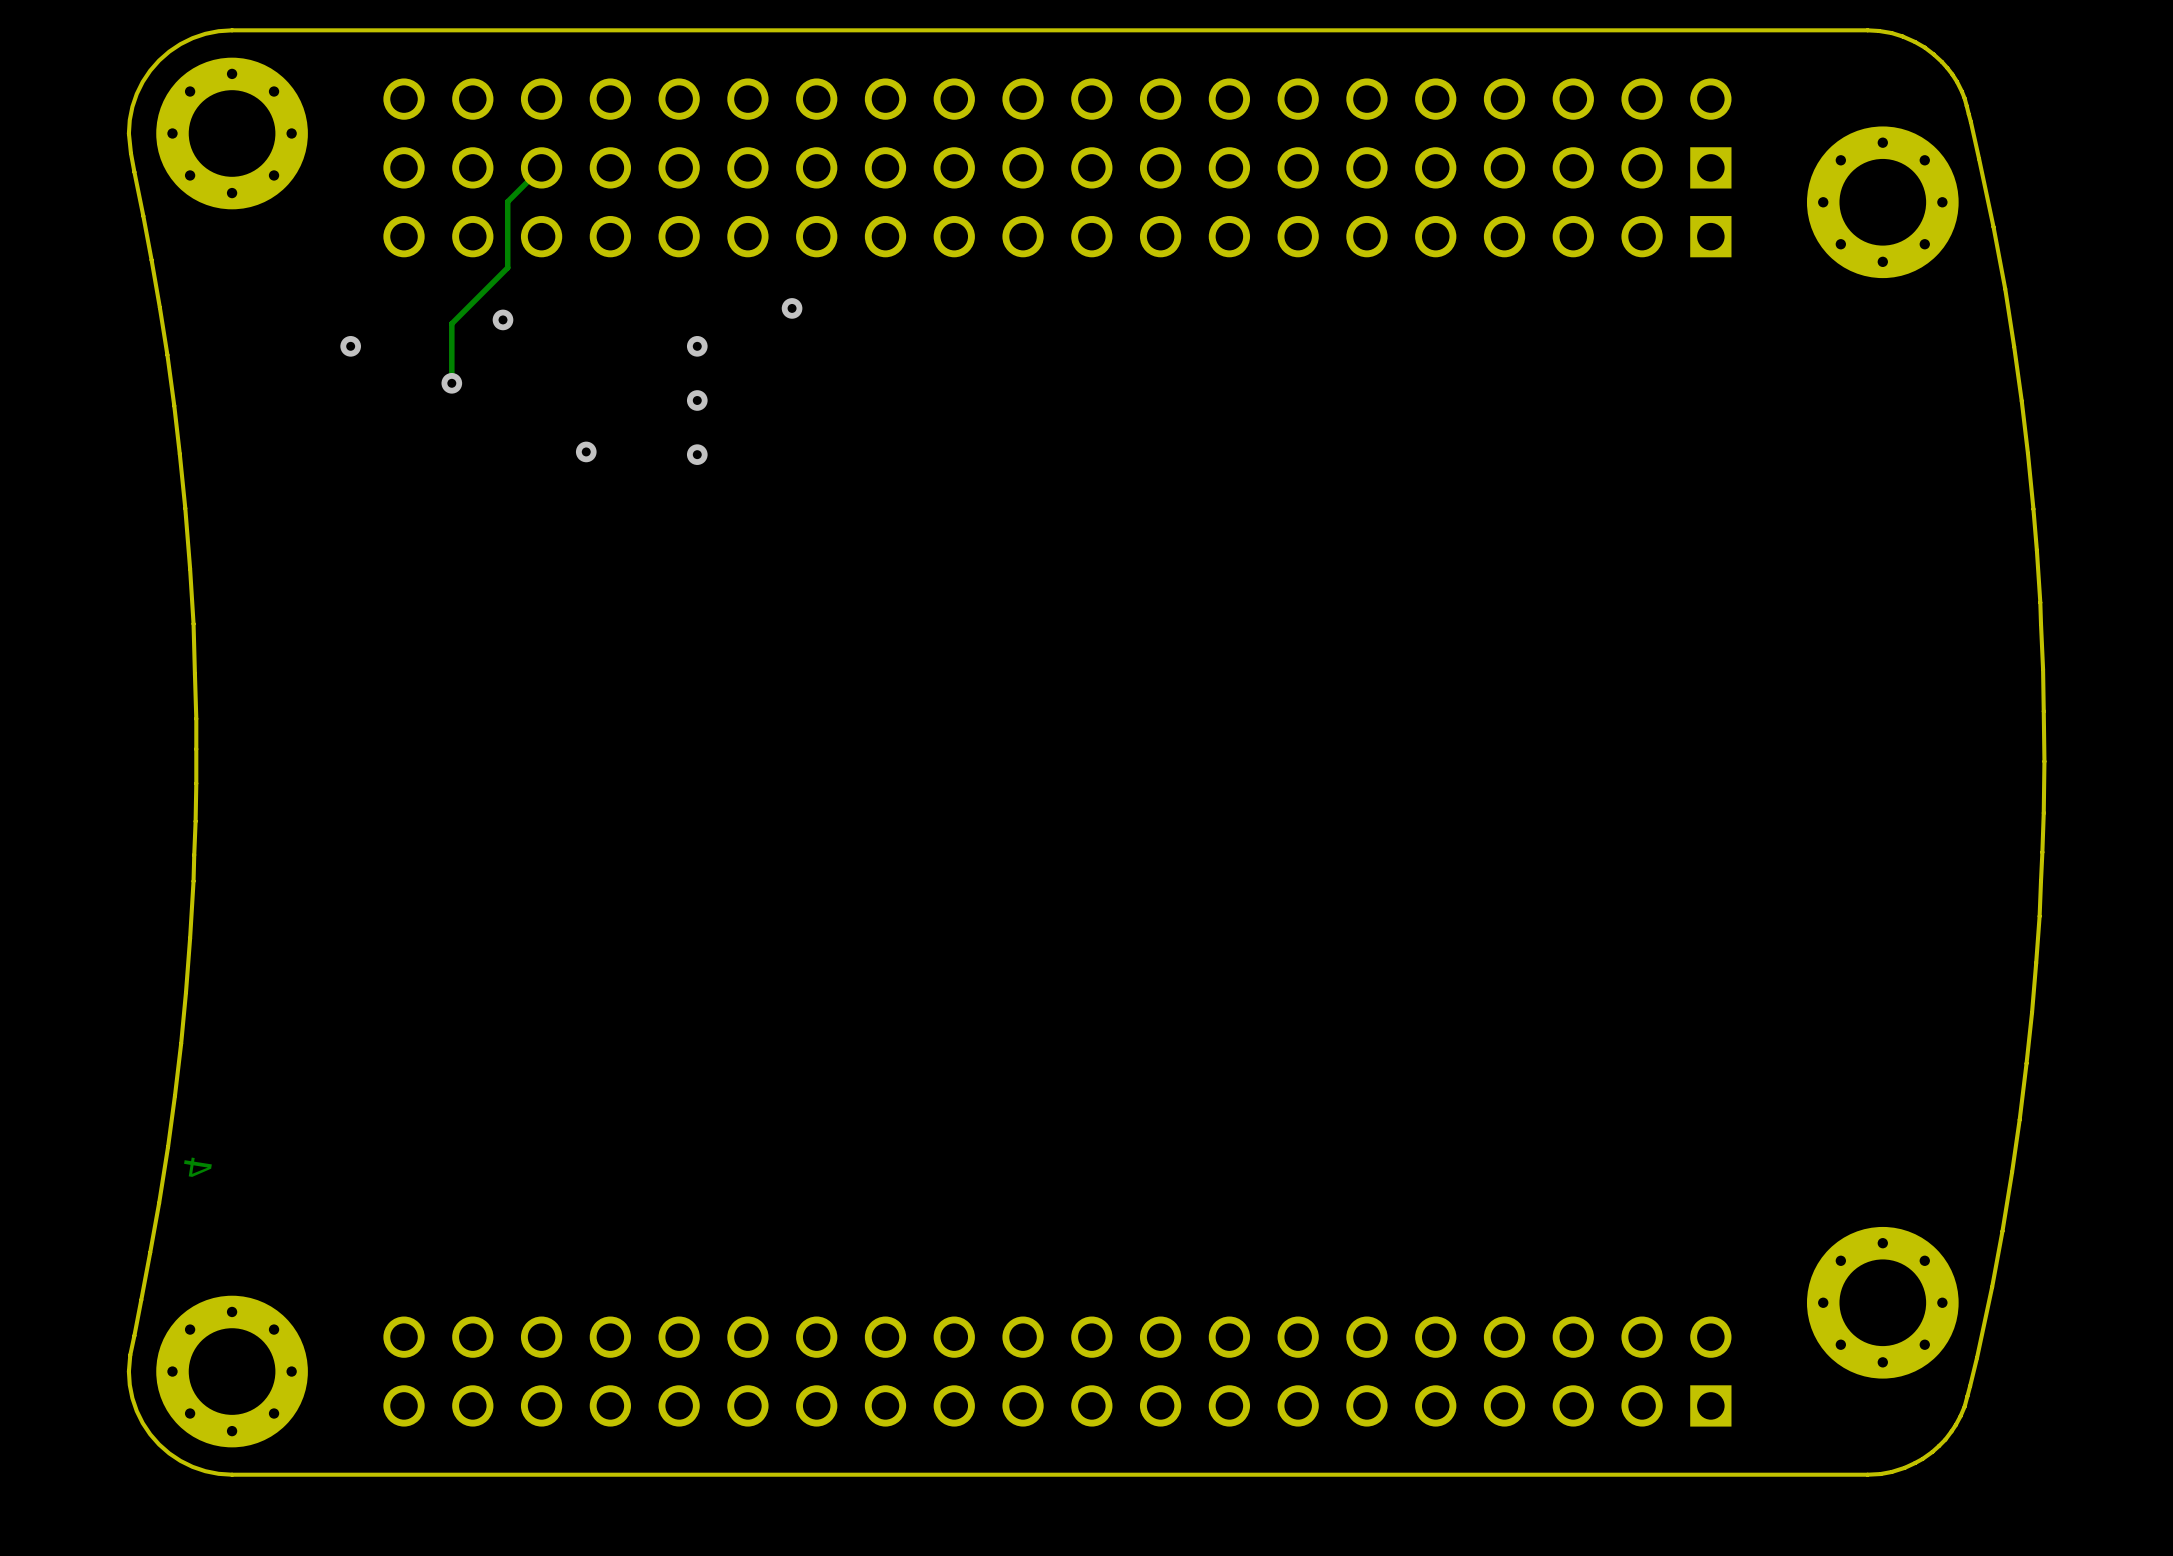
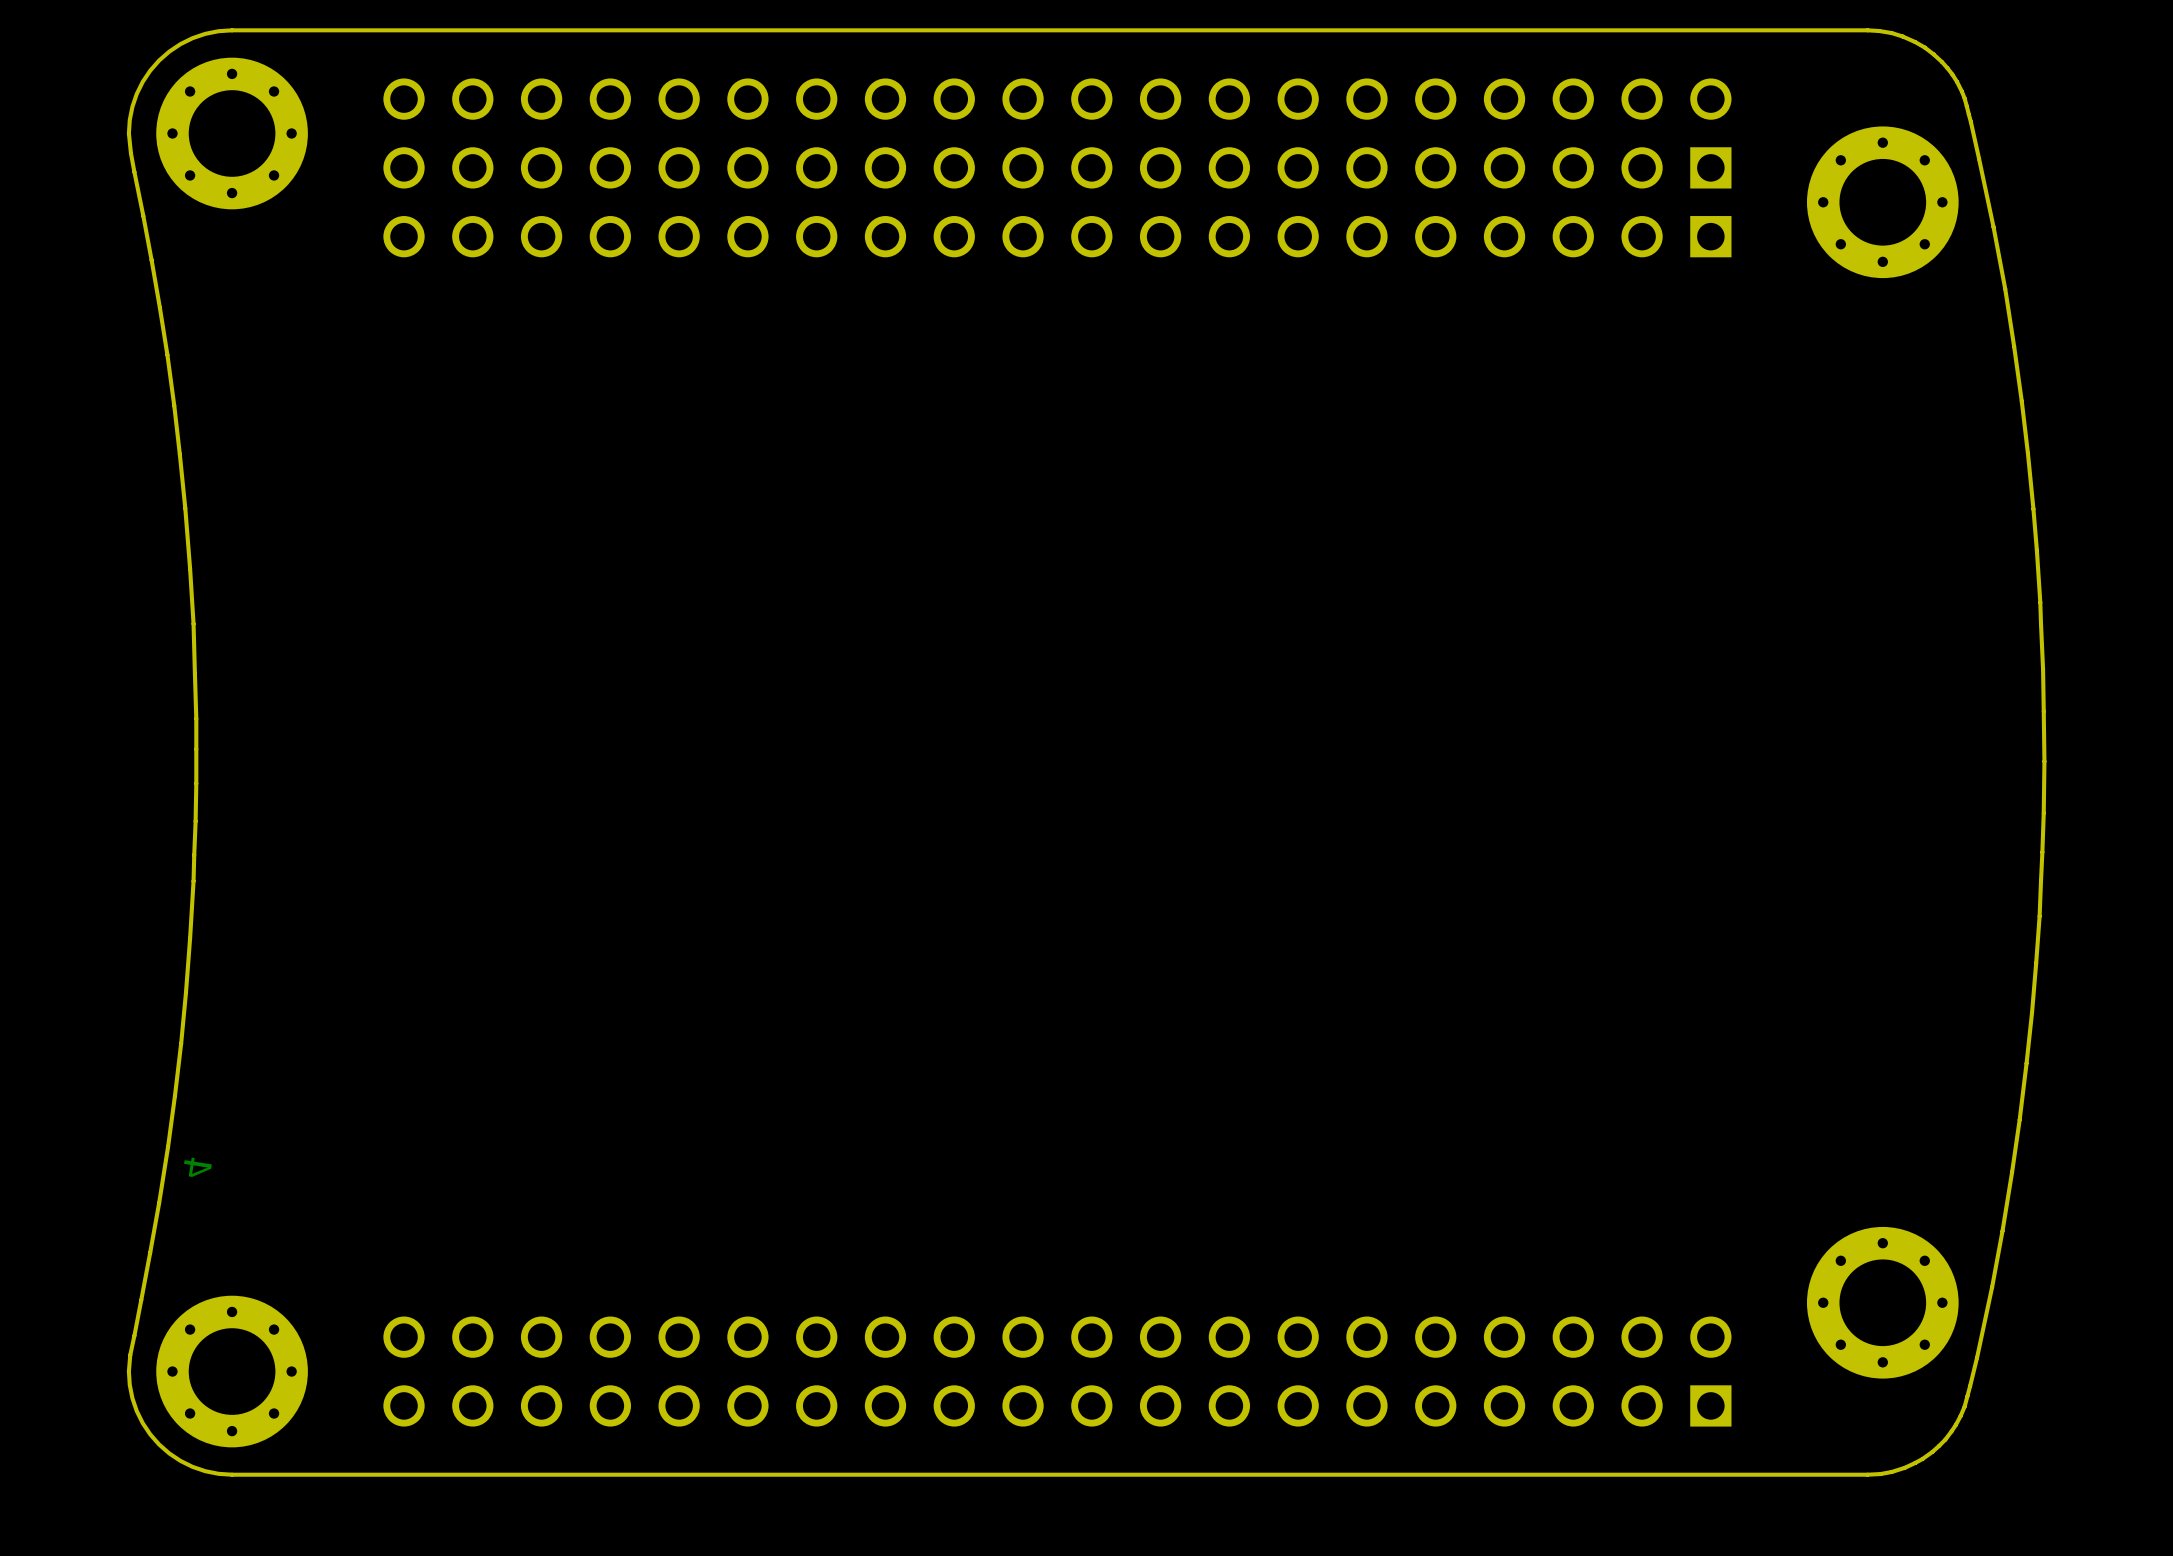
track: (541, 167) (507, 201) (507, 267) (451, 323) (451, 383) -> none
via: (792, 308) -> none
via: (502, 319) -> none
via: (350, 346) -> none
via: (697, 346) -> none
via: (451, 383) -> none
via: (697, 400) -> none
via: (586, 451) -> none
via: (697, 454) -> none

